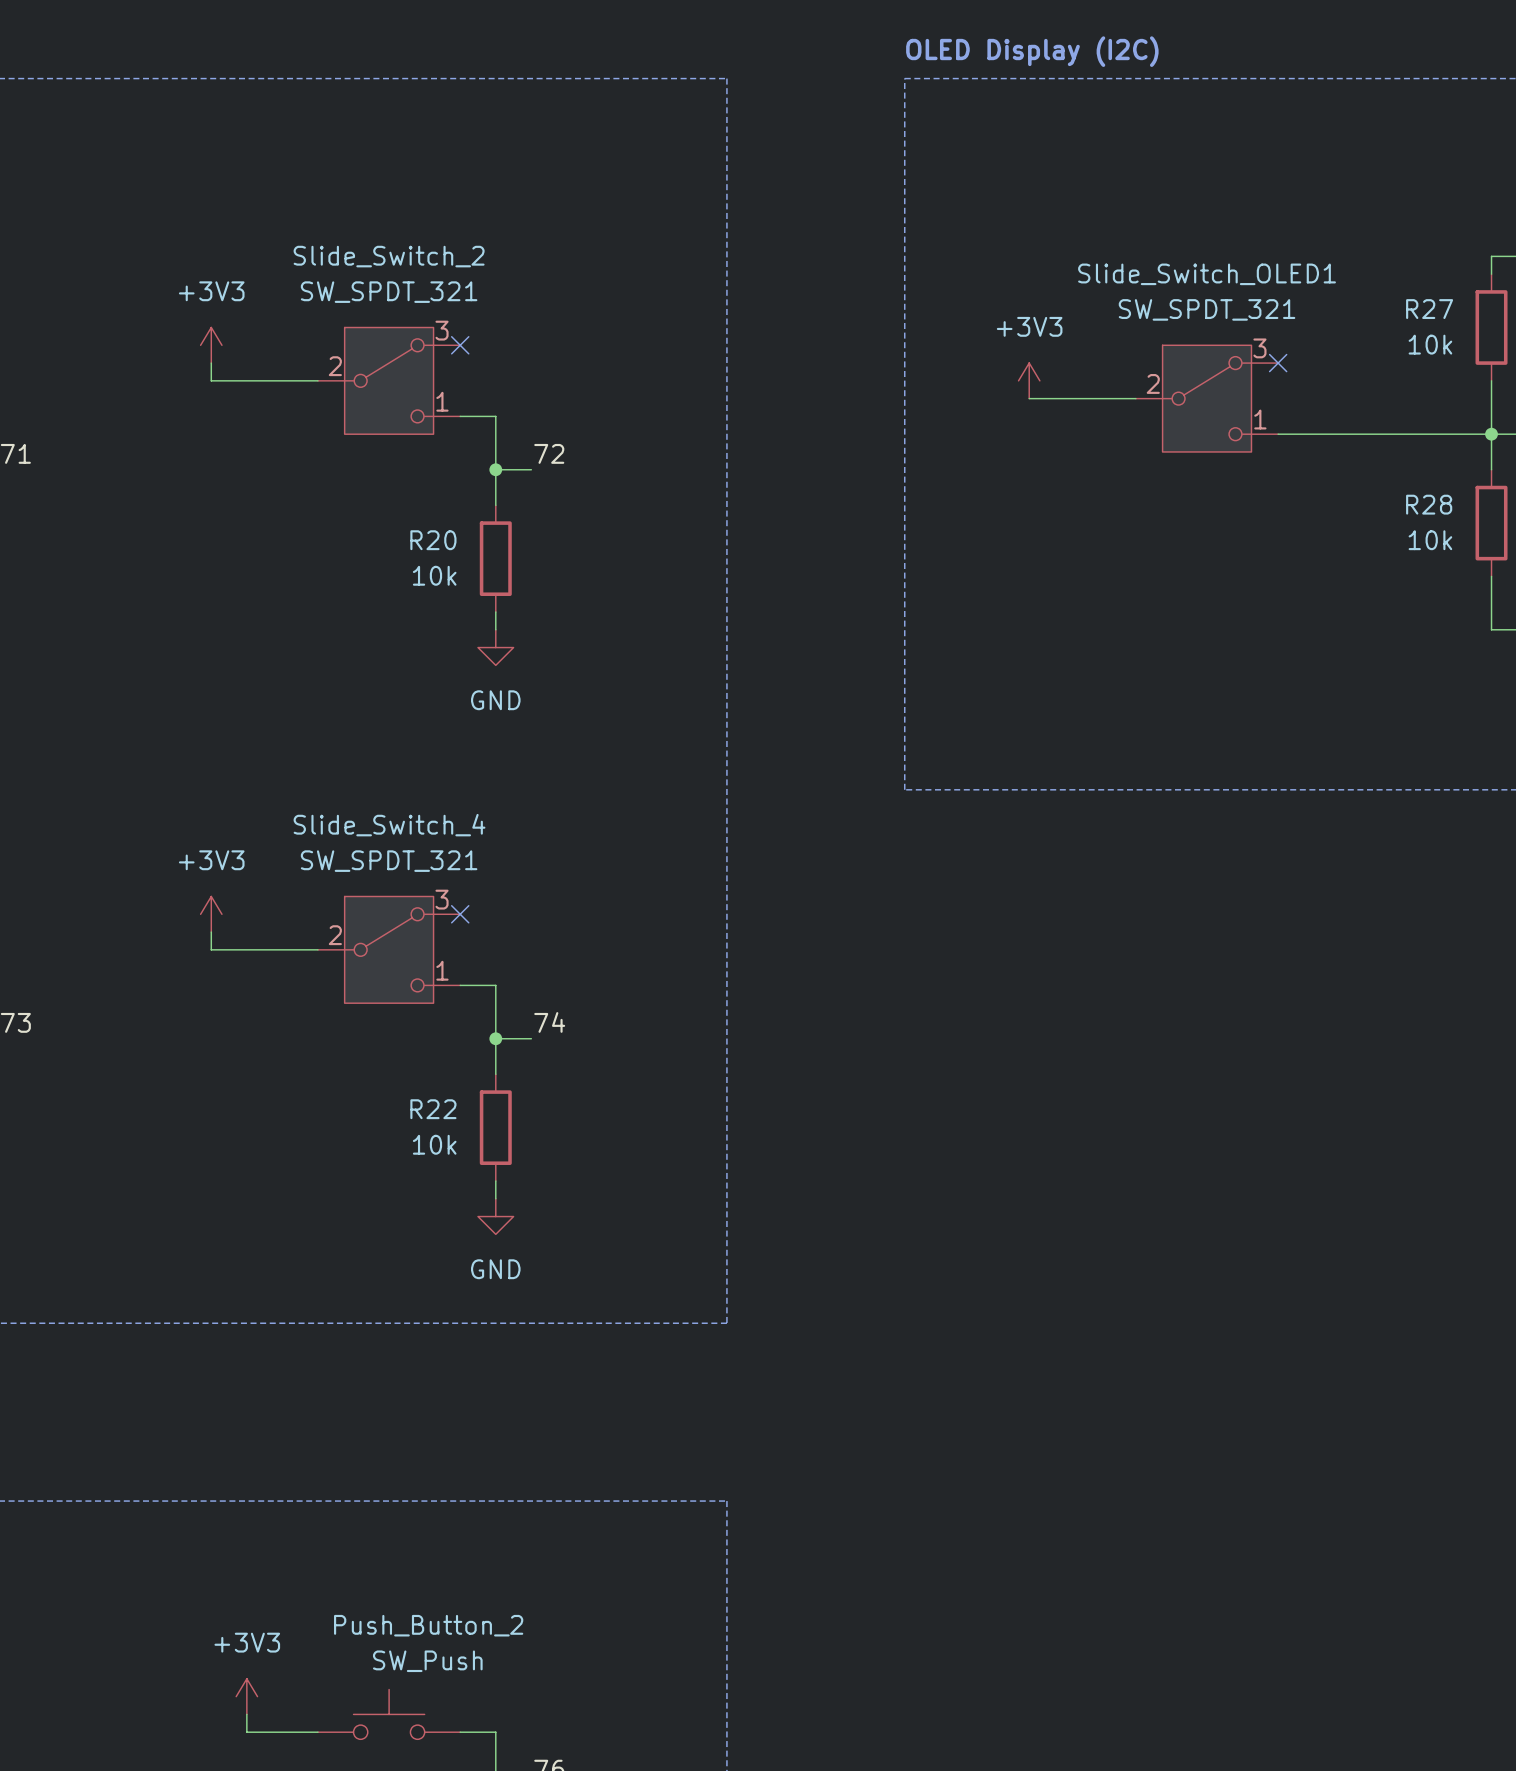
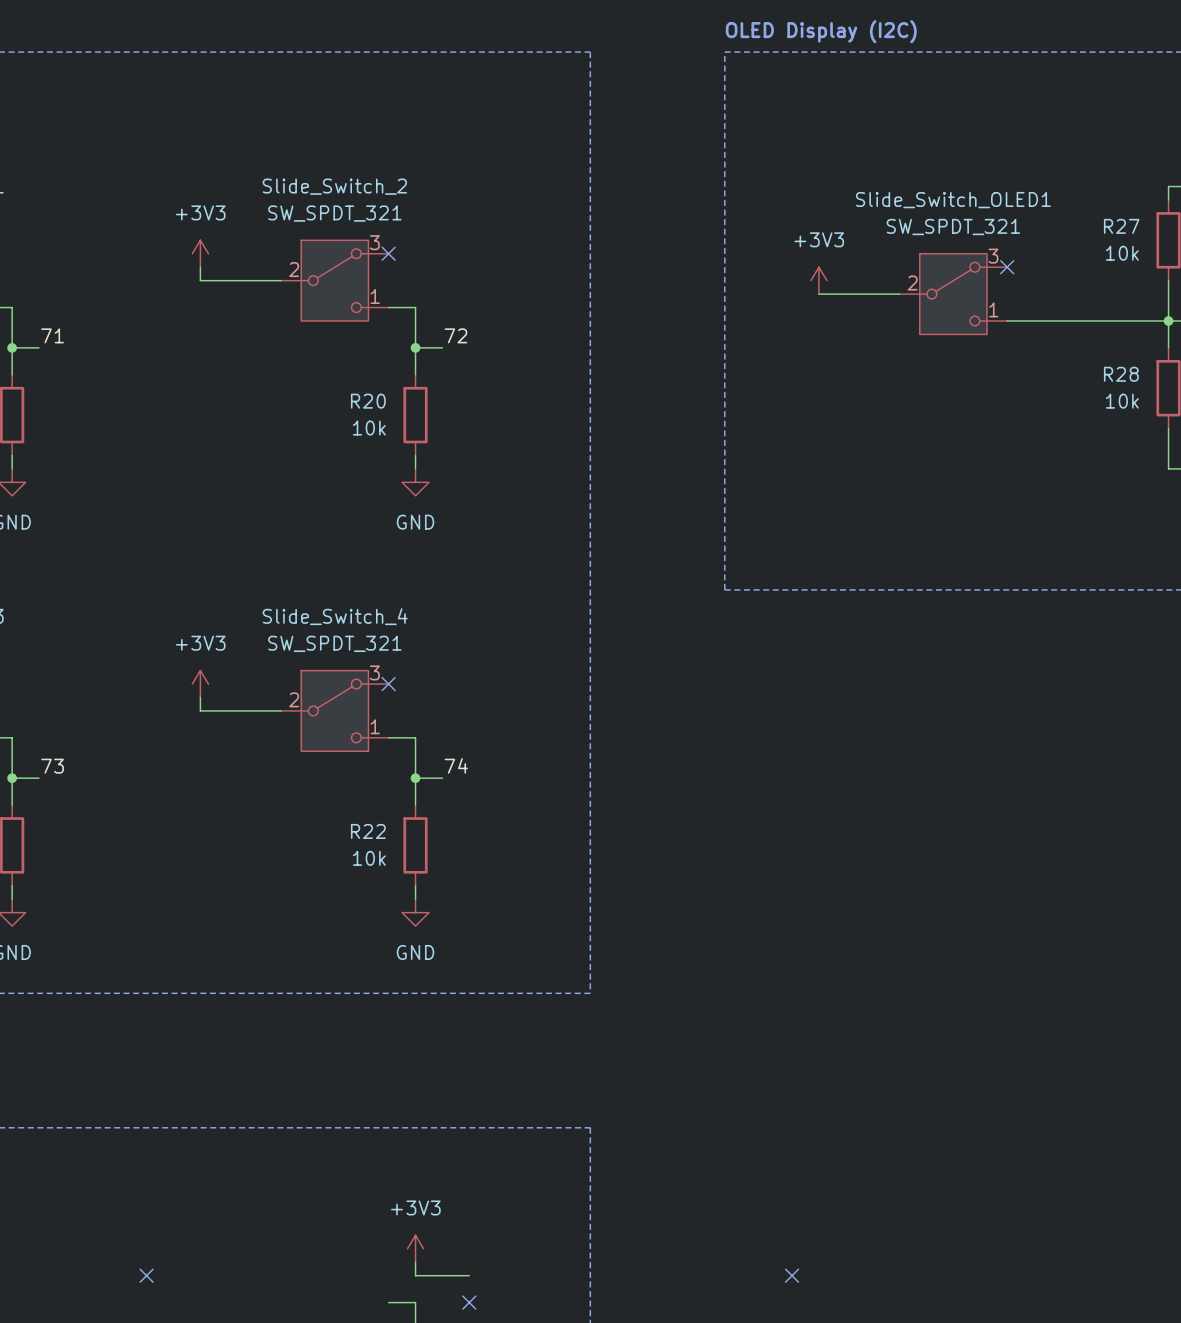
no-connect mark: none -> (146, 1275)
power symbol position: +3V3 (246, 1696) -> +3V3 (415, 1248)
no-connect mark: none -> (792, 1275)
wire: (246, 1714) (246, 1732) (317, 1732) -> (415, 1262) (415, 1275) (469, 1275)
Push_Button_2: SW_Push (389, 1714) -> none
no-connect mark: none -> (469, 1302)

